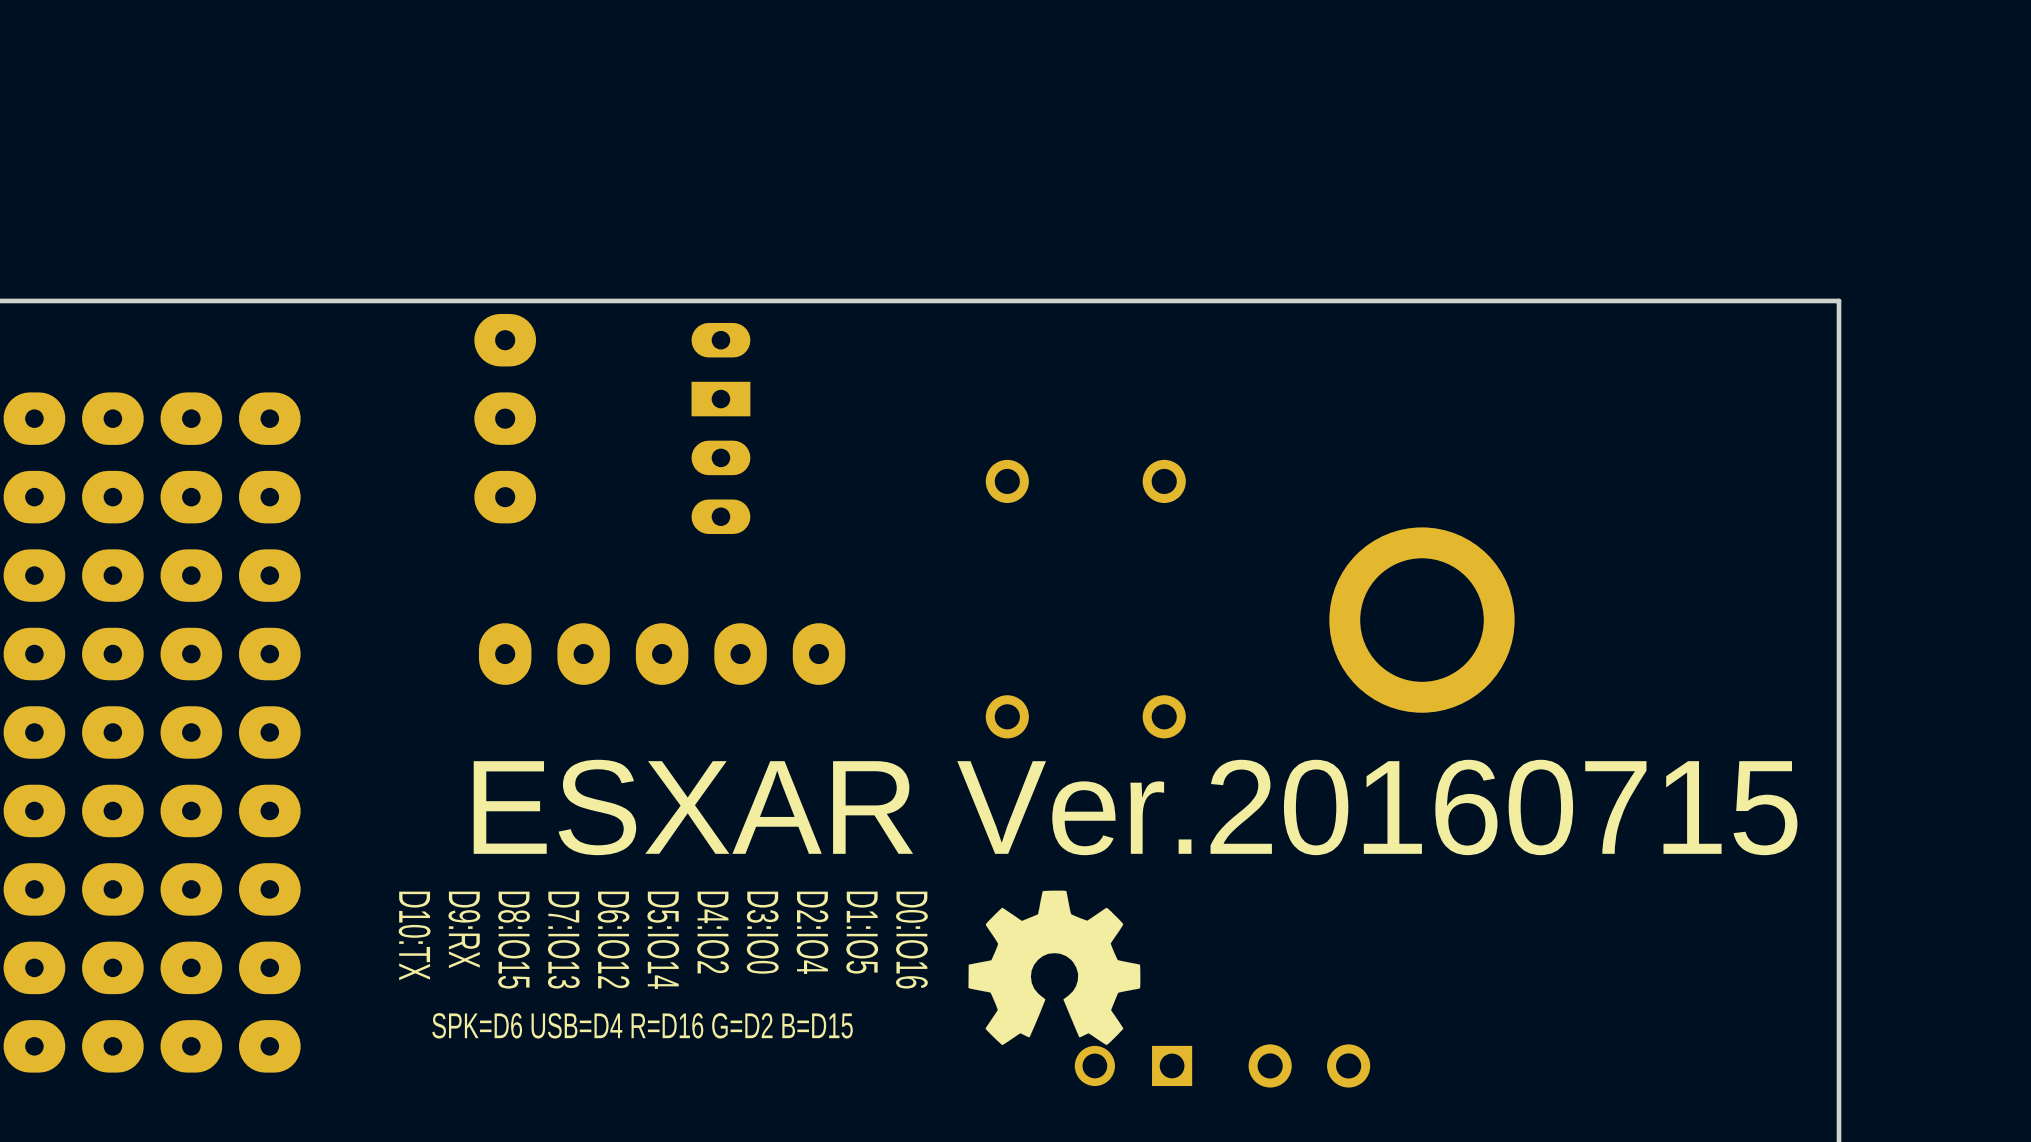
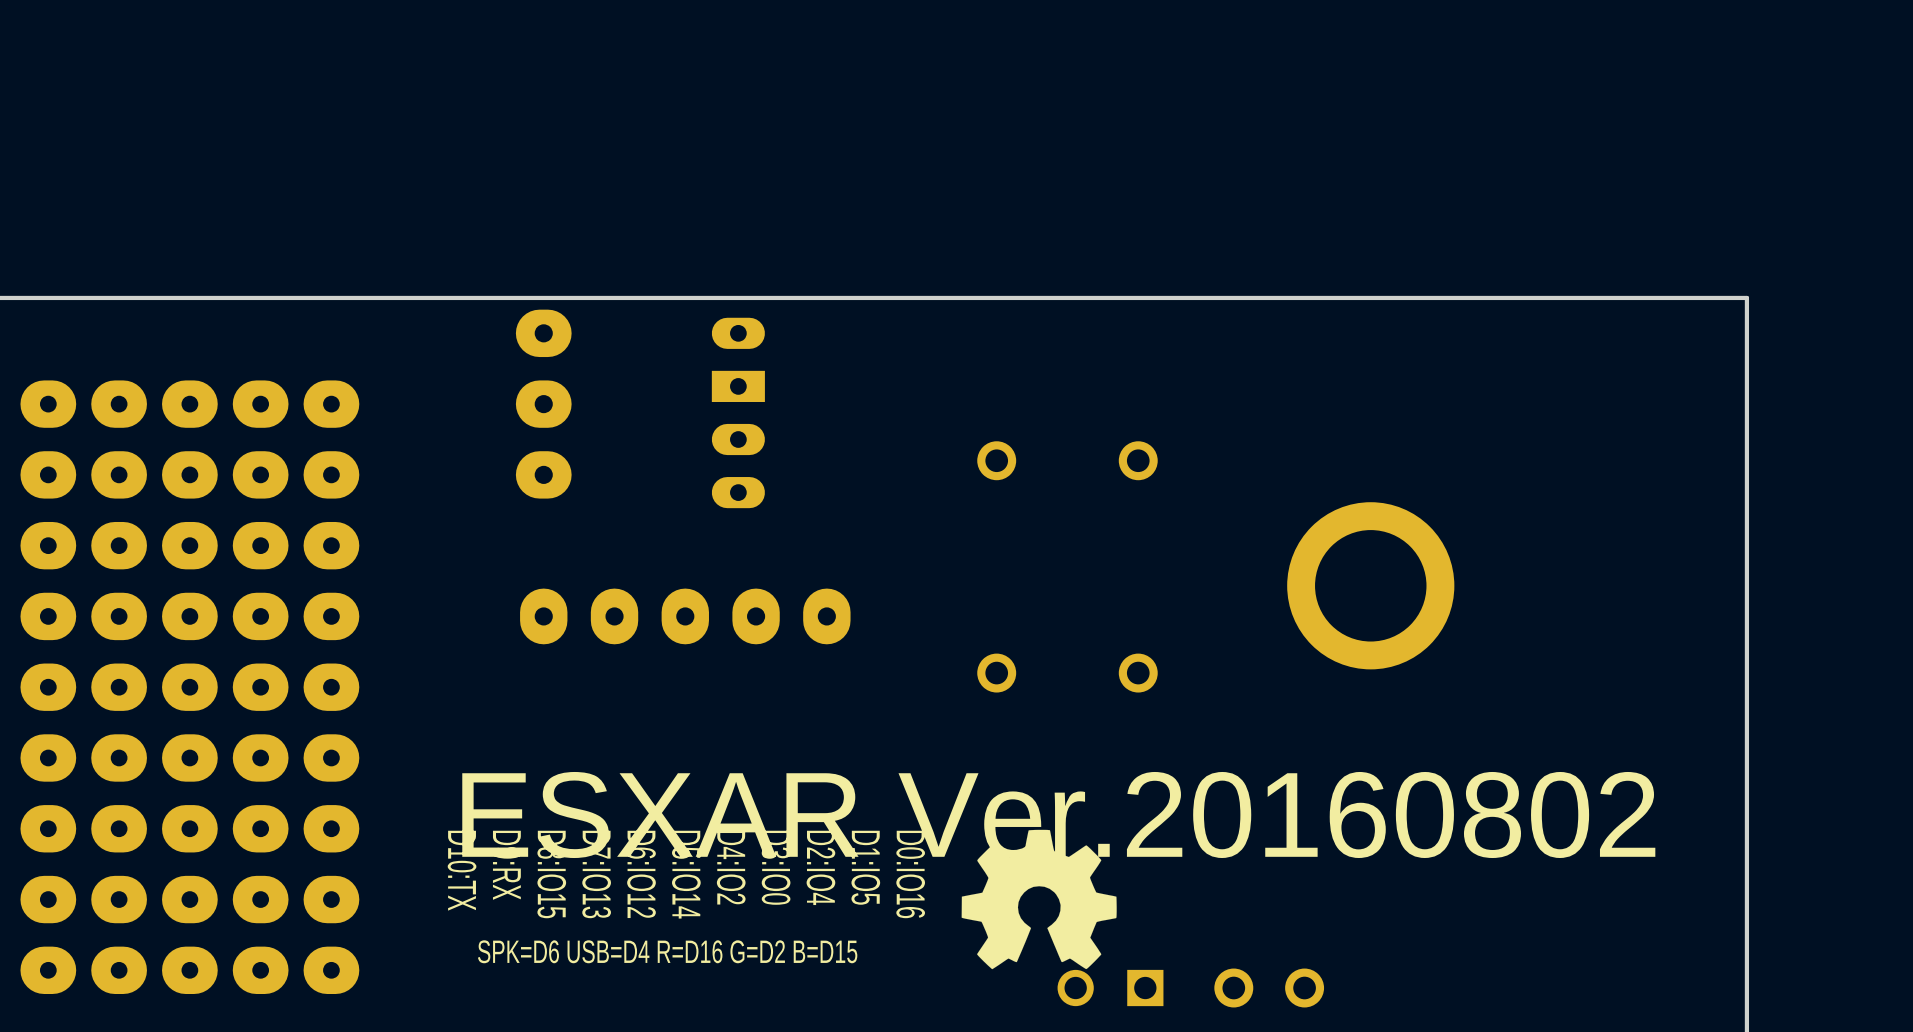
text: ESXAR Ver.20160715 (1135, 807) -> ESXAR Ver.20160802 (1058, 814)

